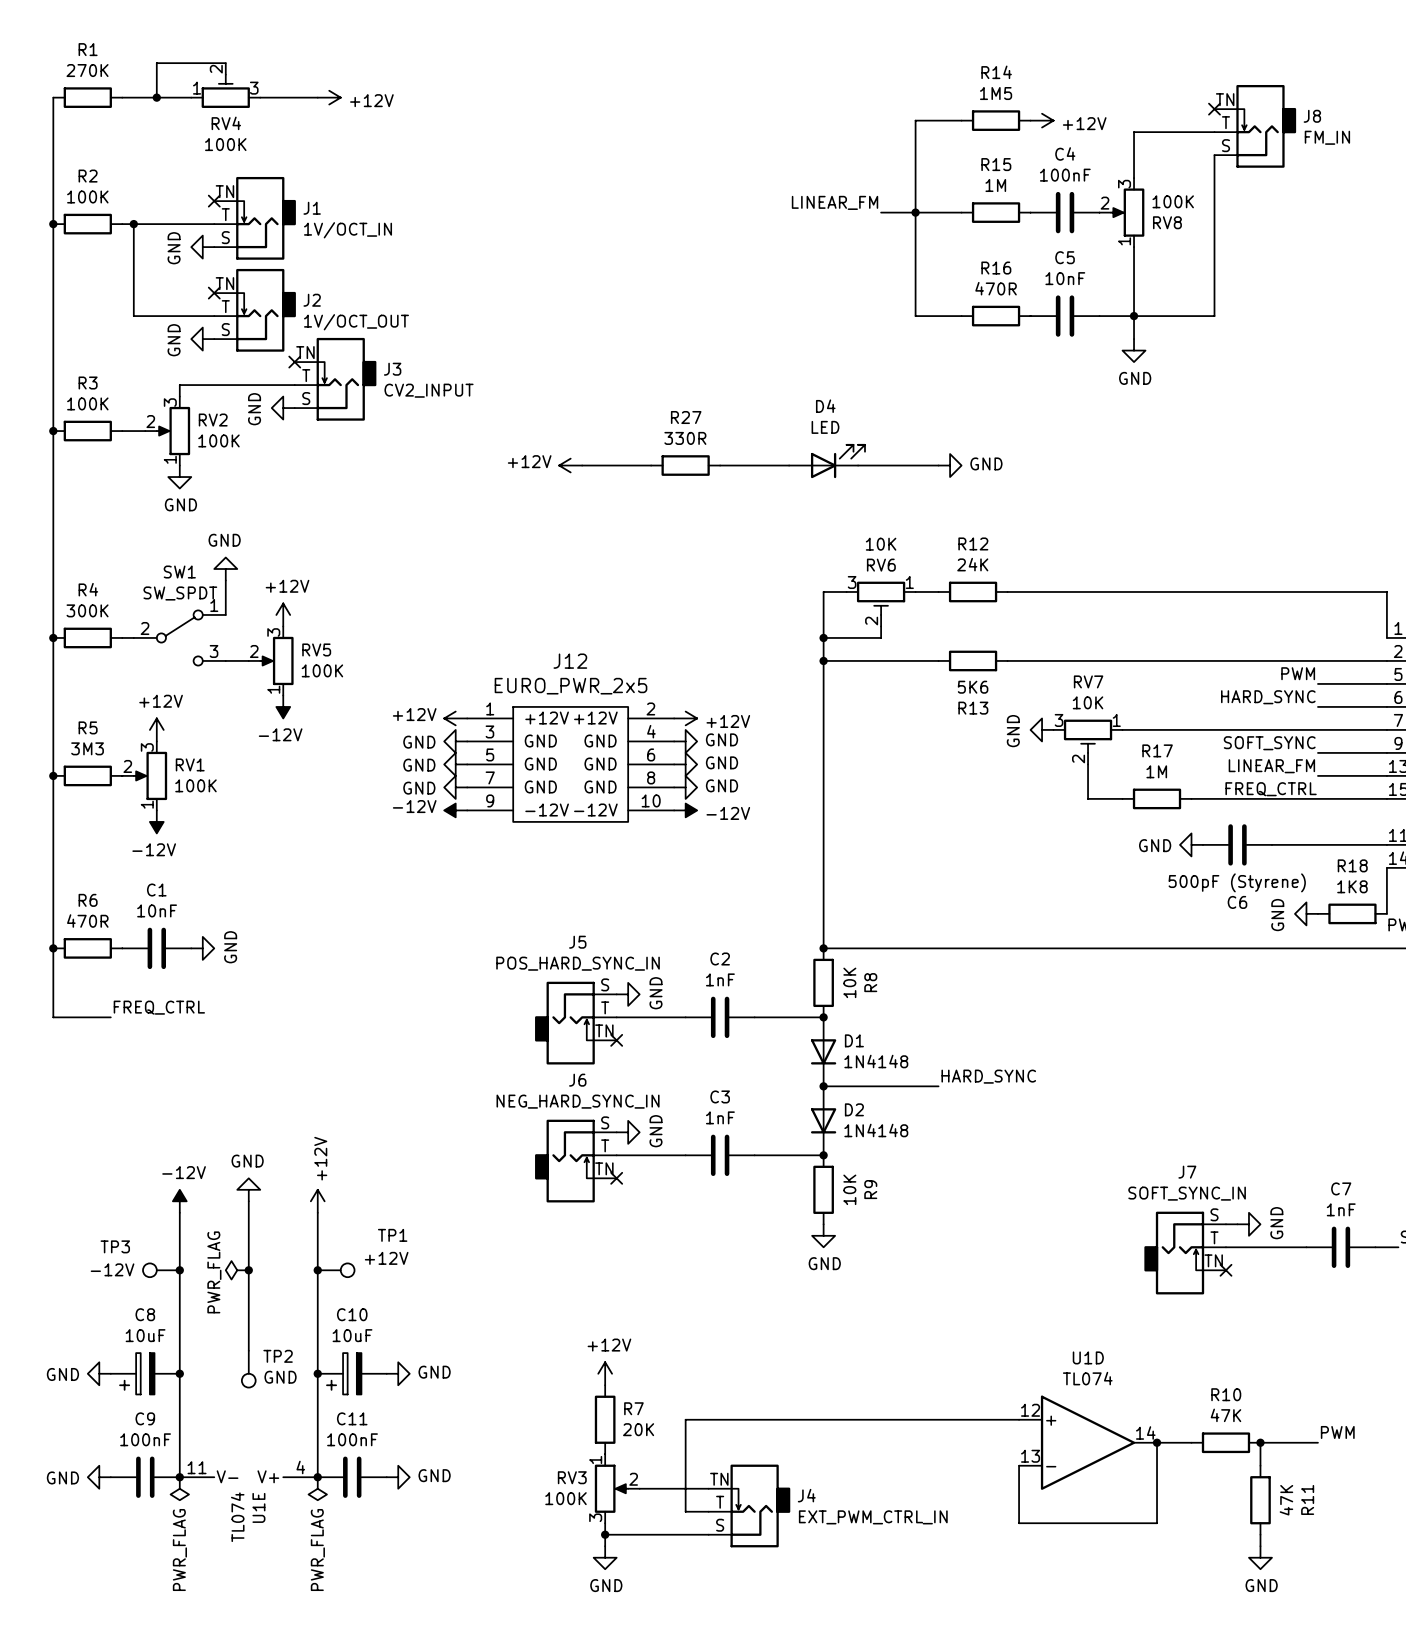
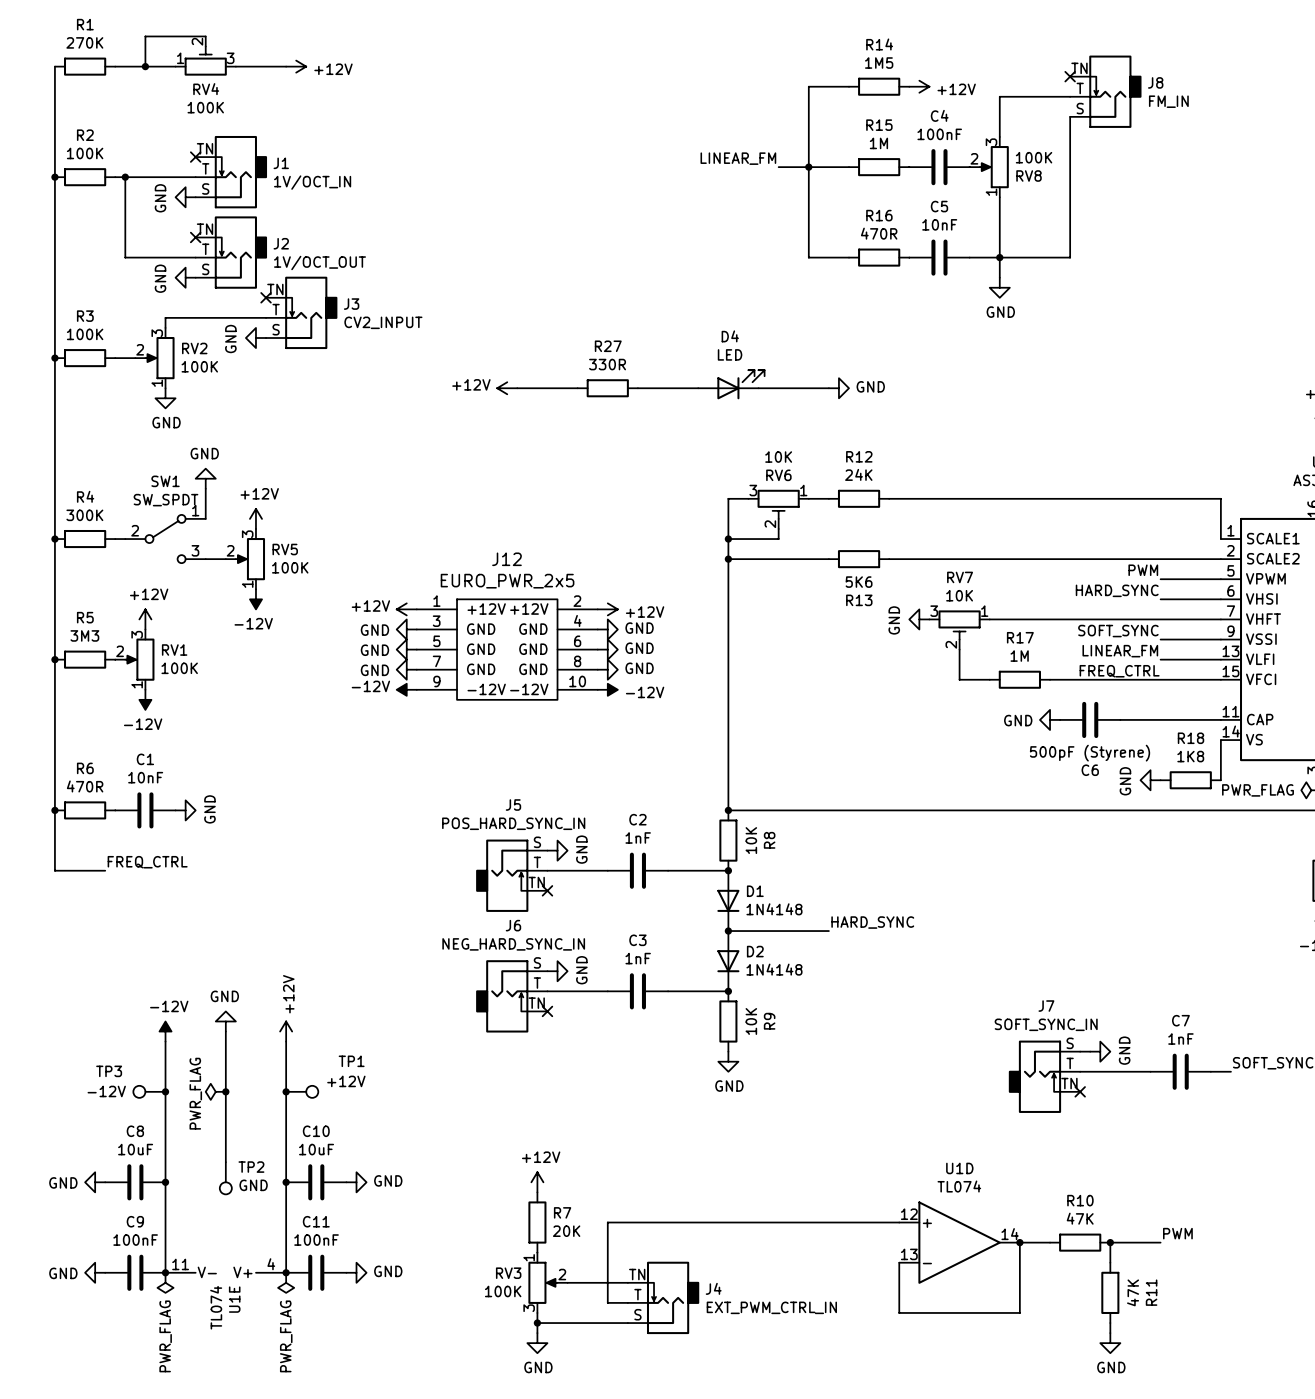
C8 symbol: [110, 1353, 180, 1395] -> [105, 1164, 166, 1201]
C10 symbol: [317, 1353, 387, 1395] -> [286, 1164, 347, 1201]

